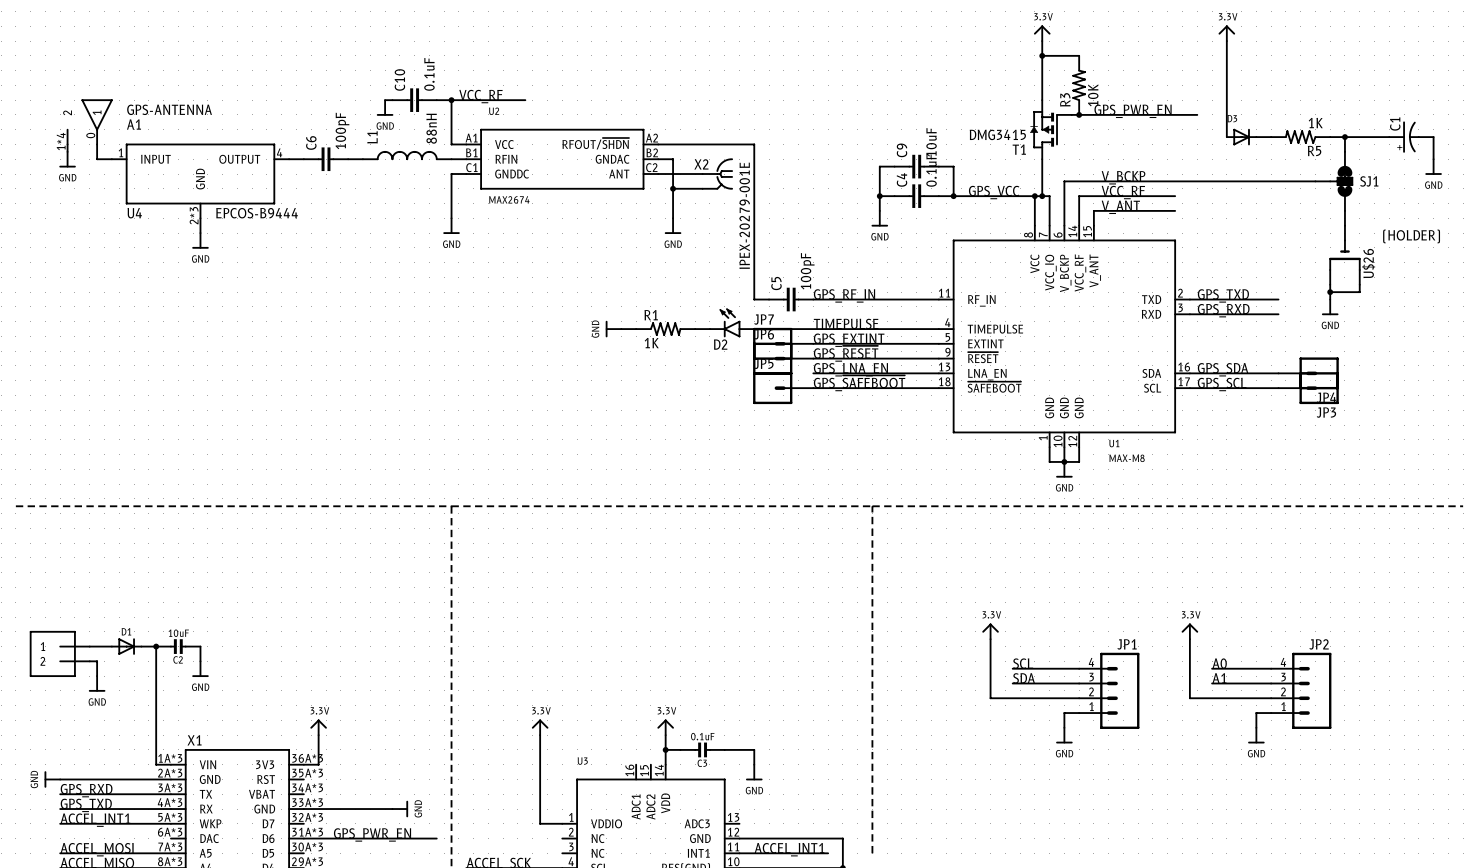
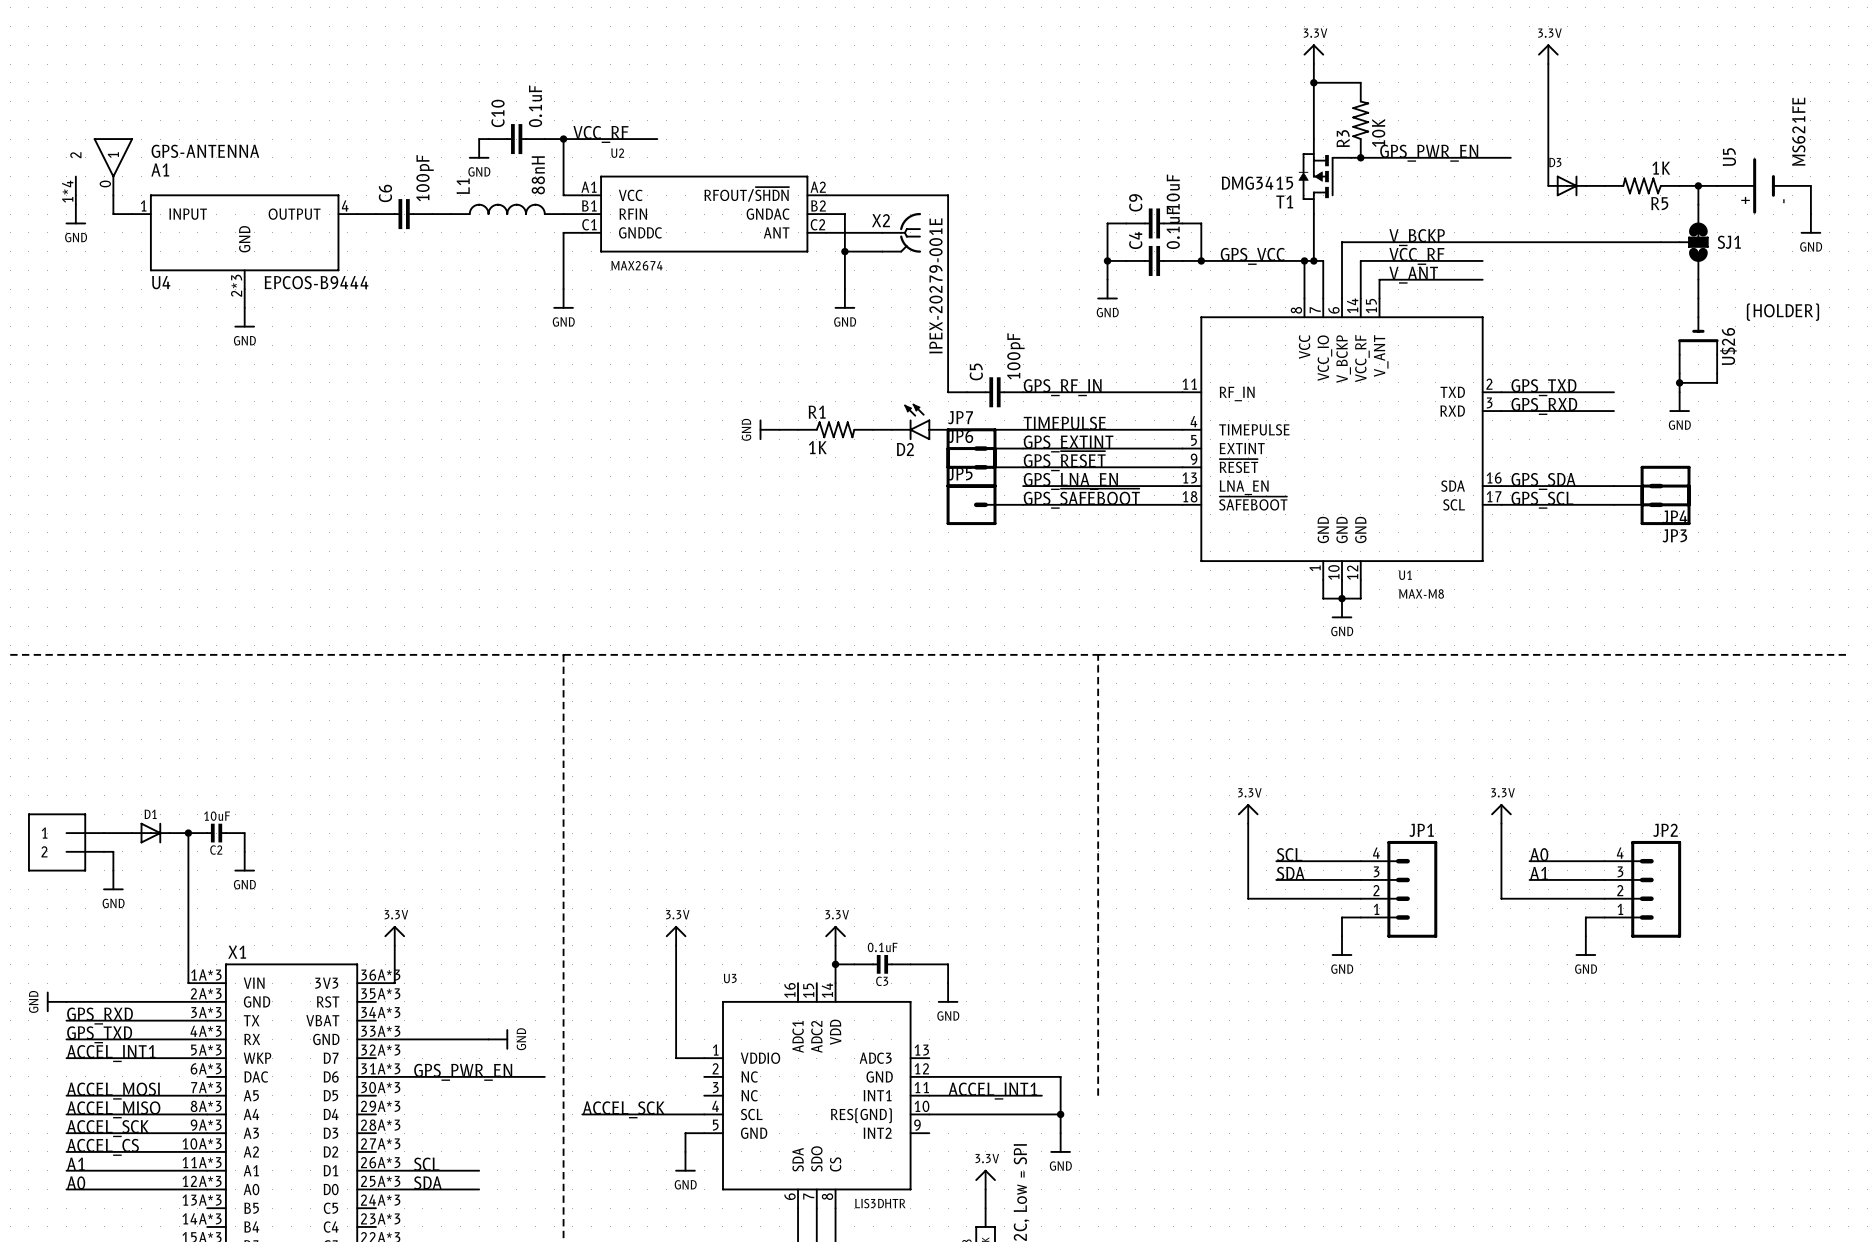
U5: none -> MS621FE (1764, 185)
C1: (1411, 137) -> none

